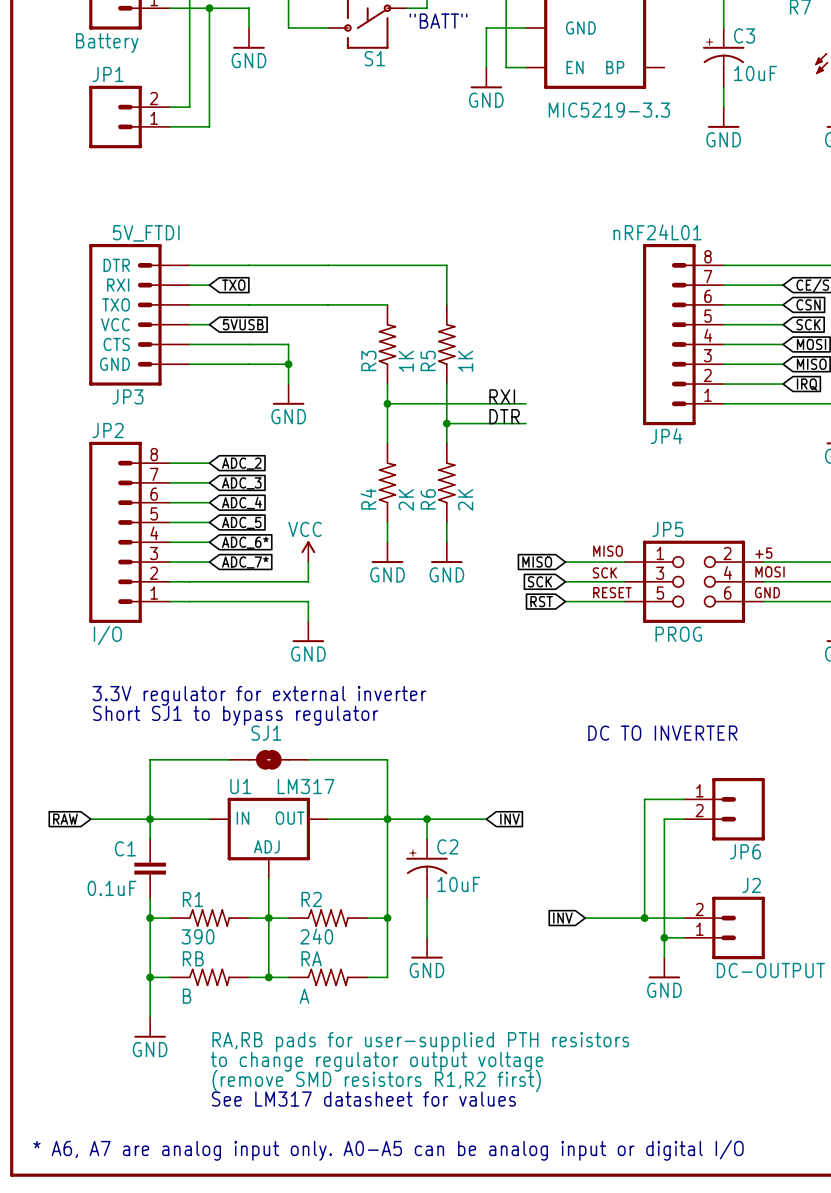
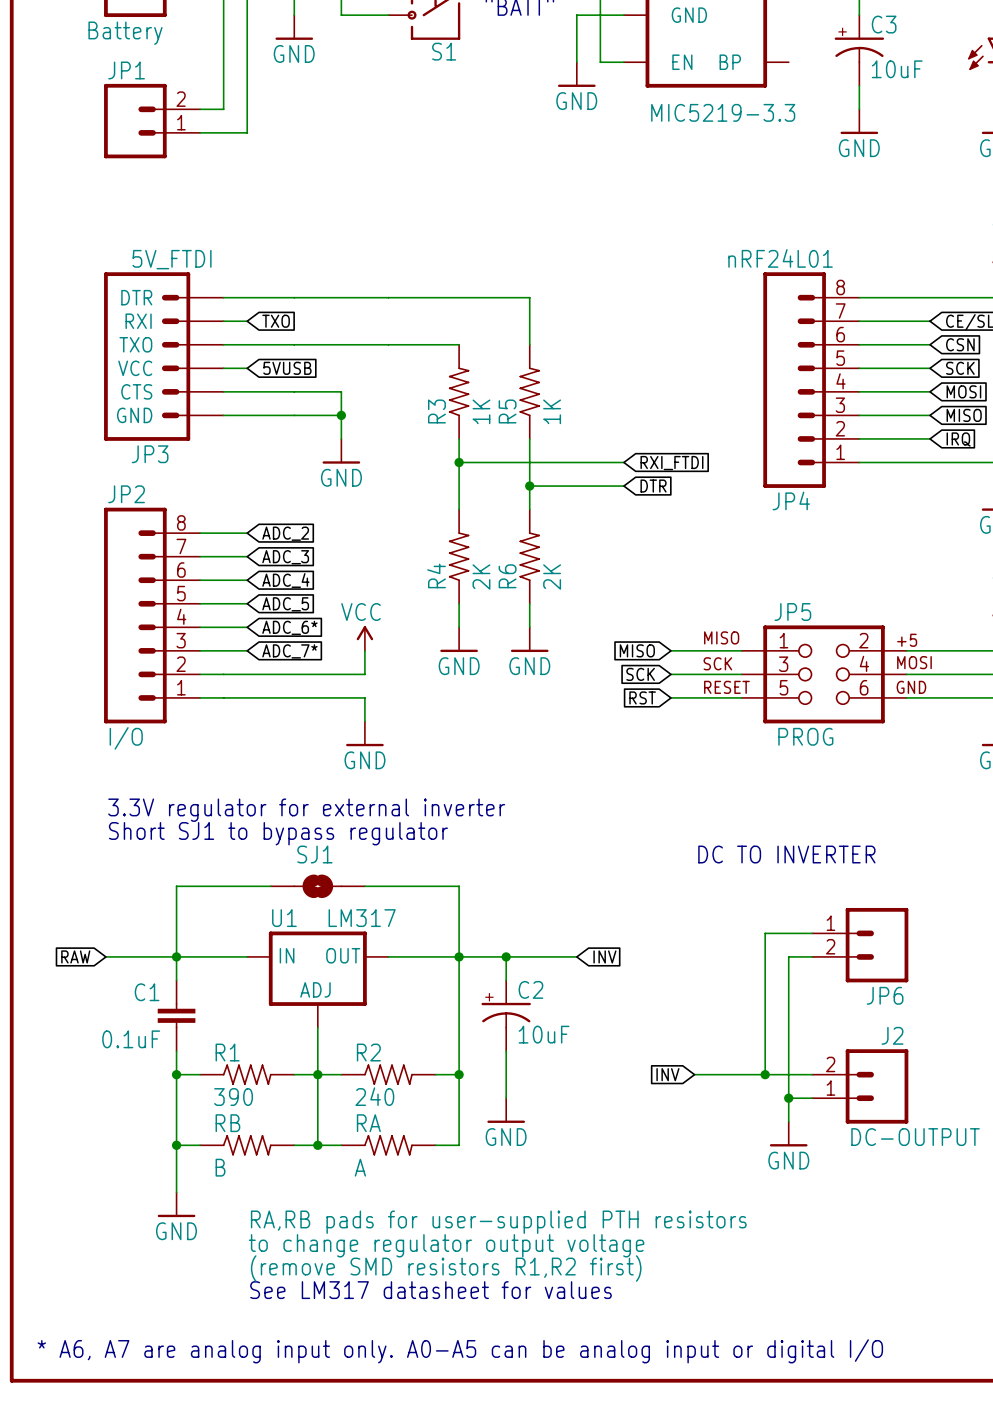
label: RXI (502, 396) -> none
global label: none -> RXI_FTDI (671, 463)
label: DTR (504, 416) -> none
global label: none -> DTR (653, 486)

